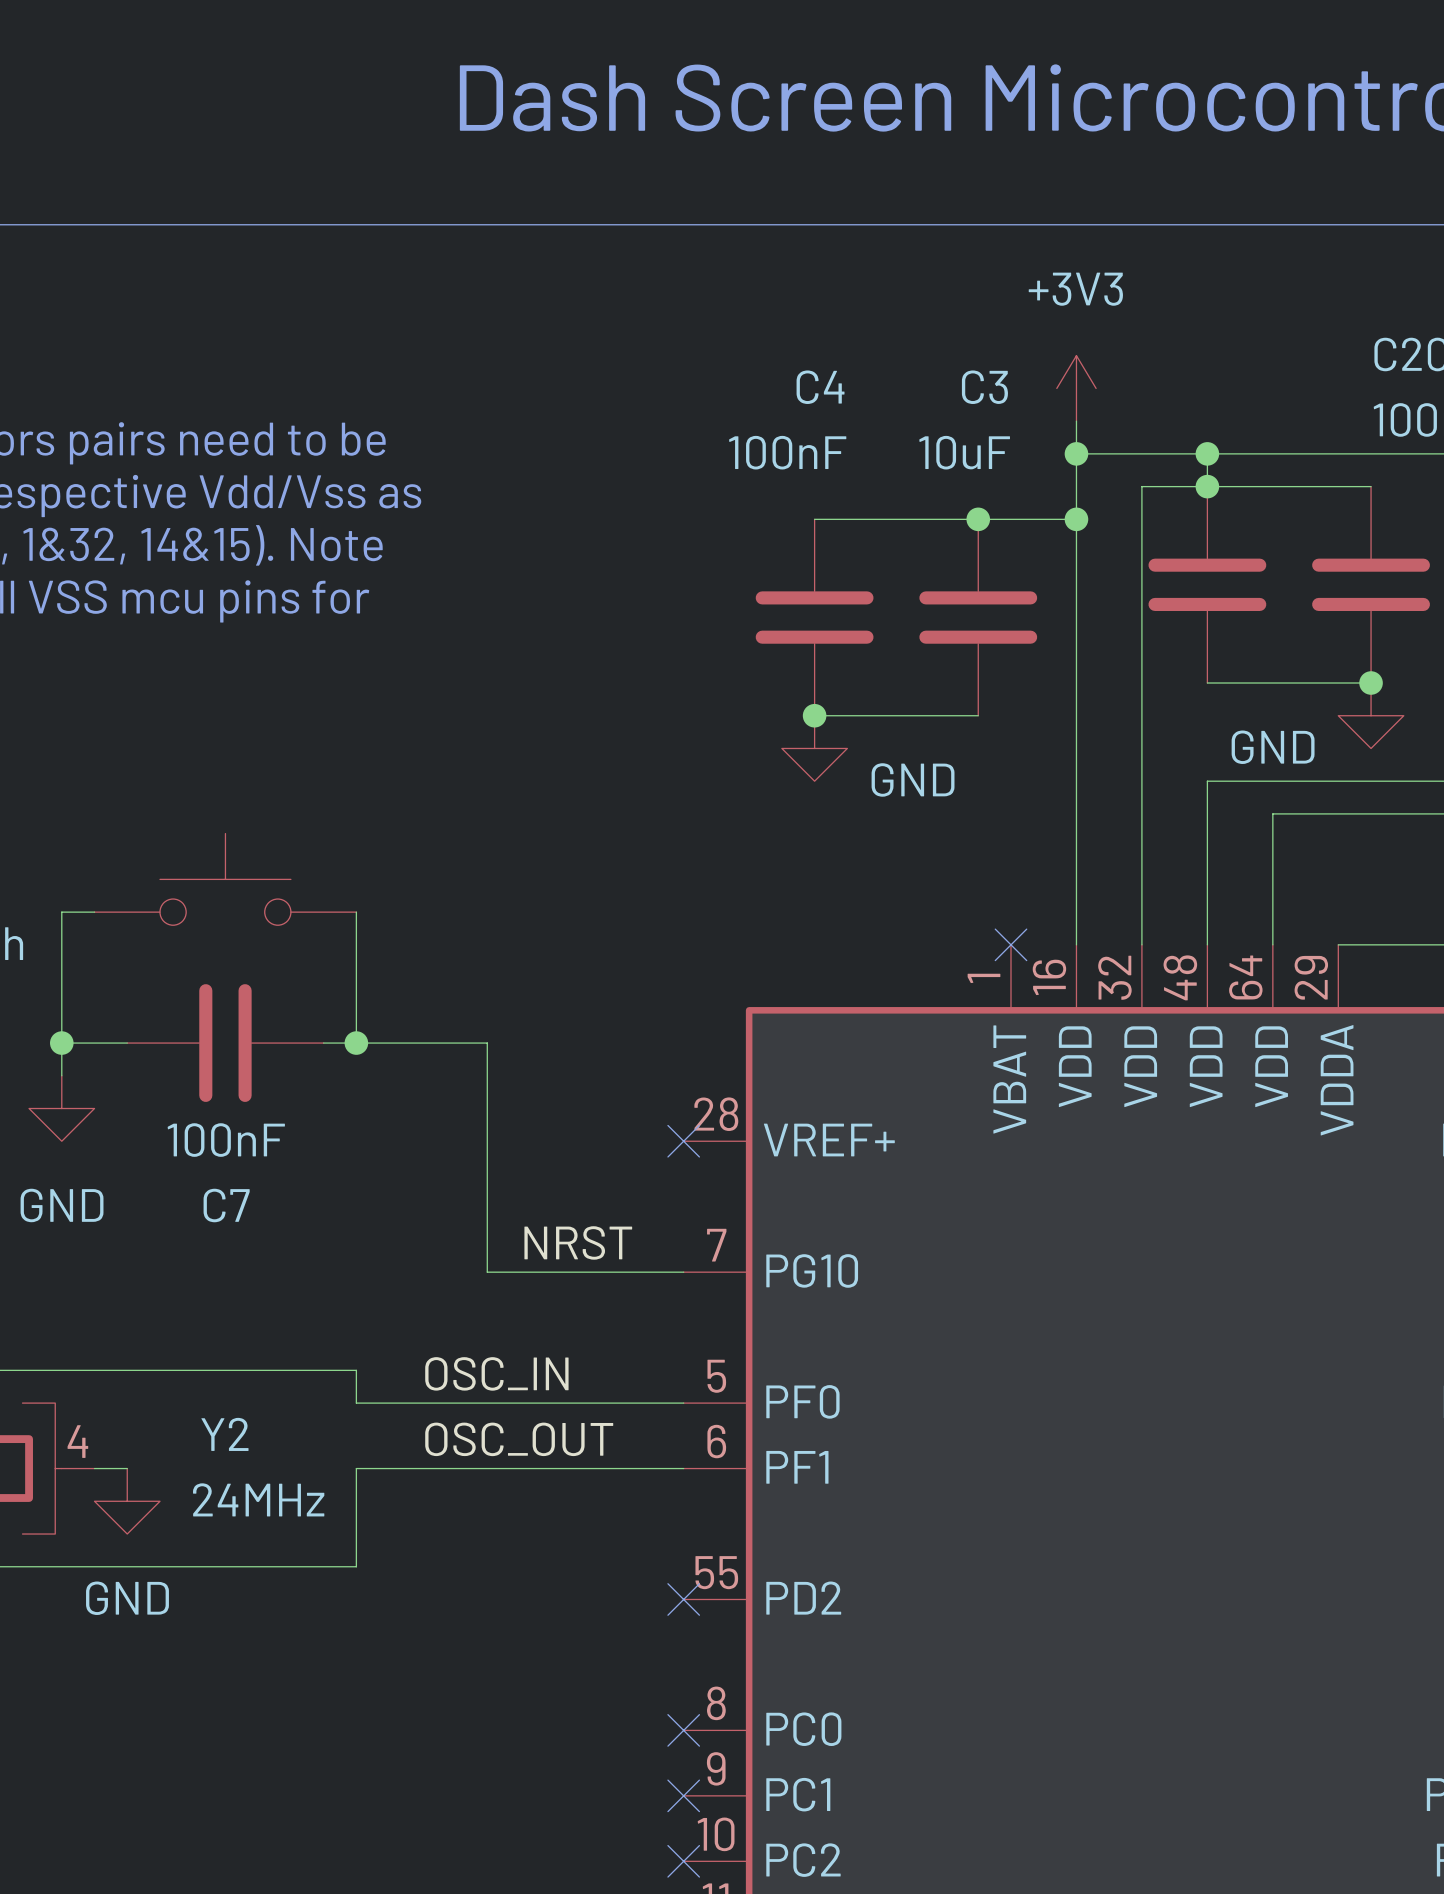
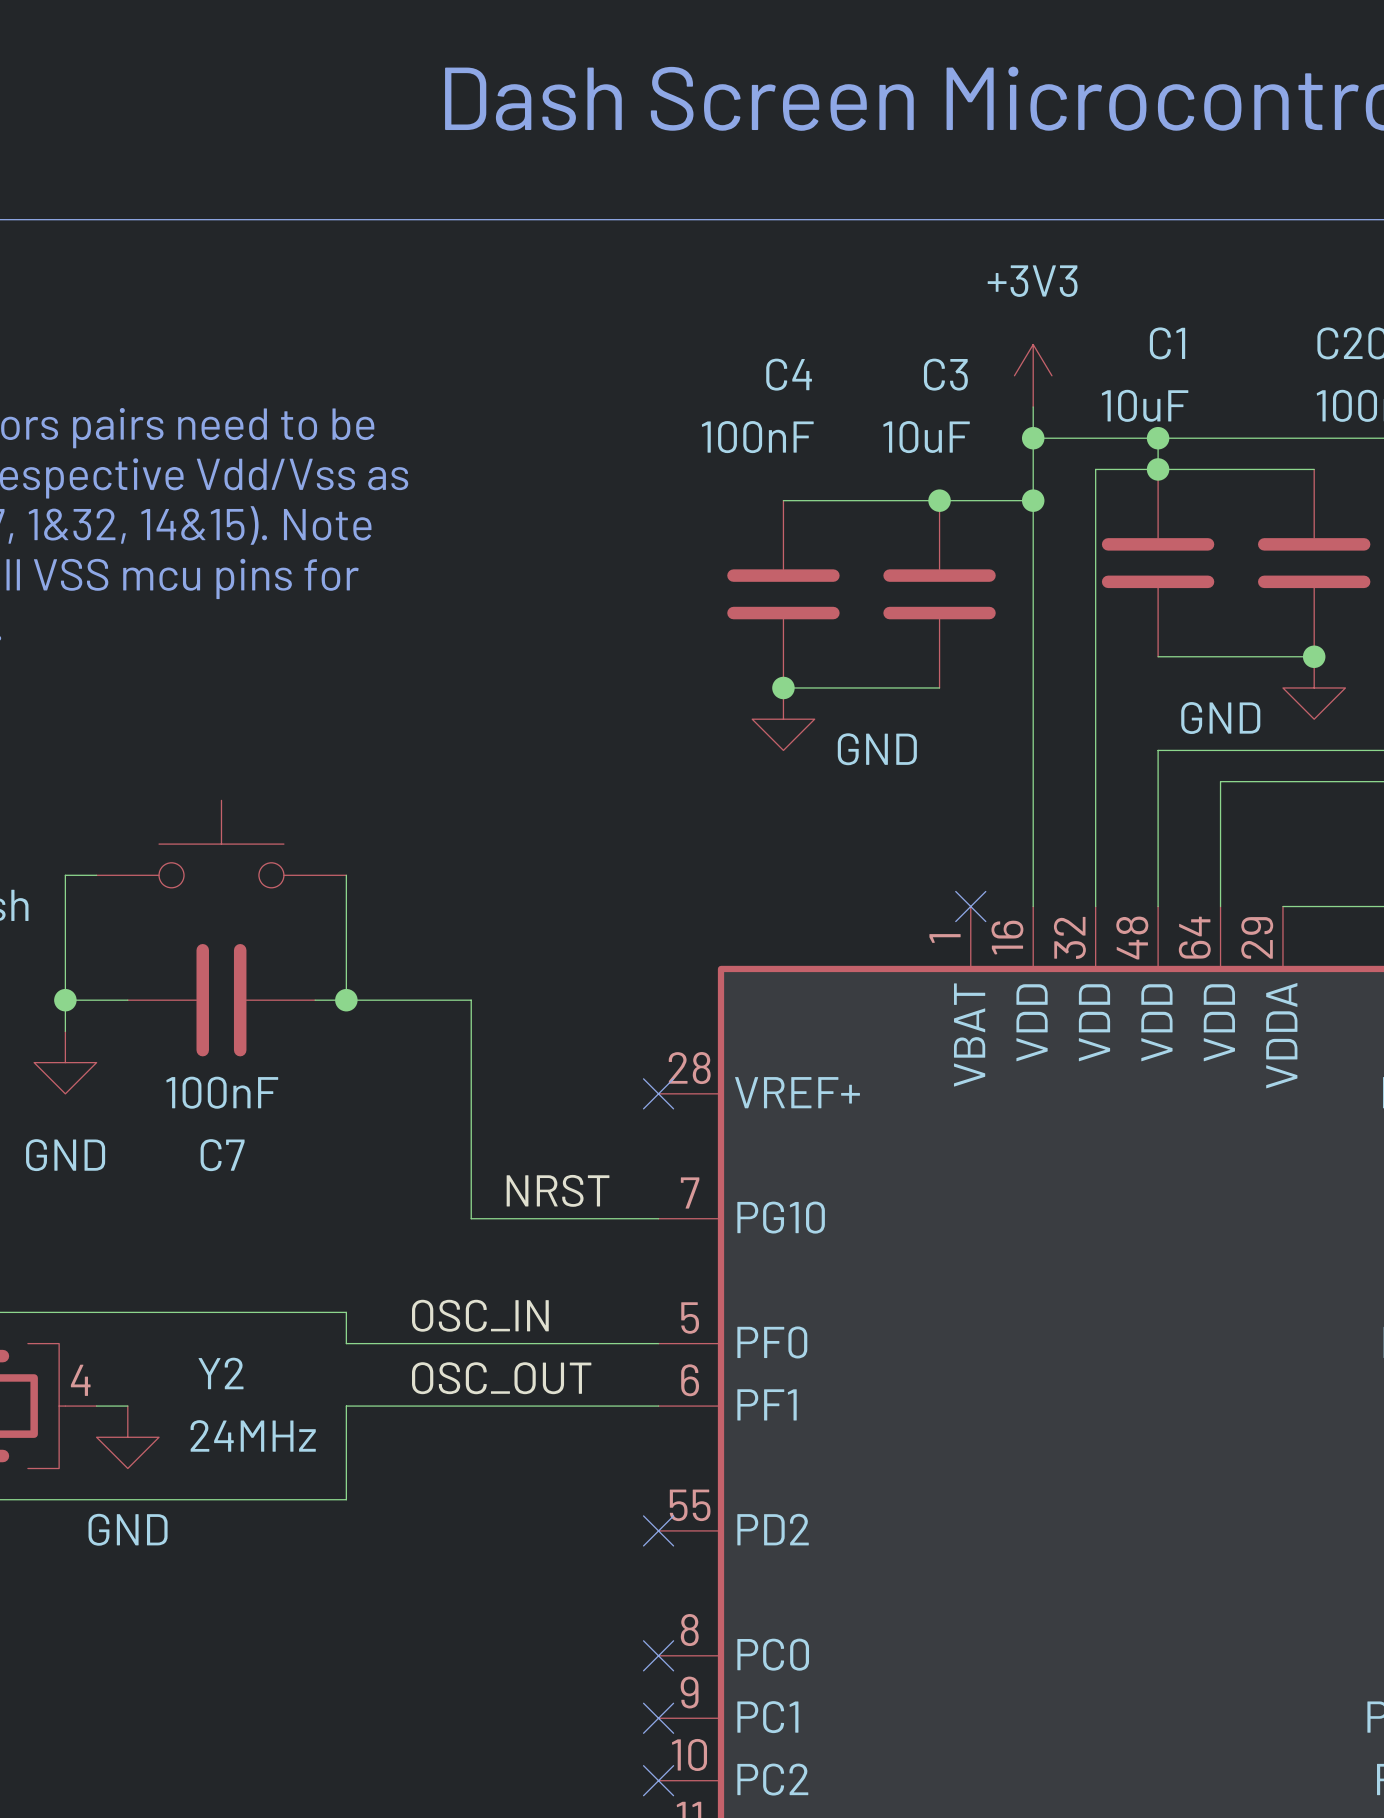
C1 name: none -> C1 (1167, 343)
C1 value: none -> 10uF (1145, 405)

